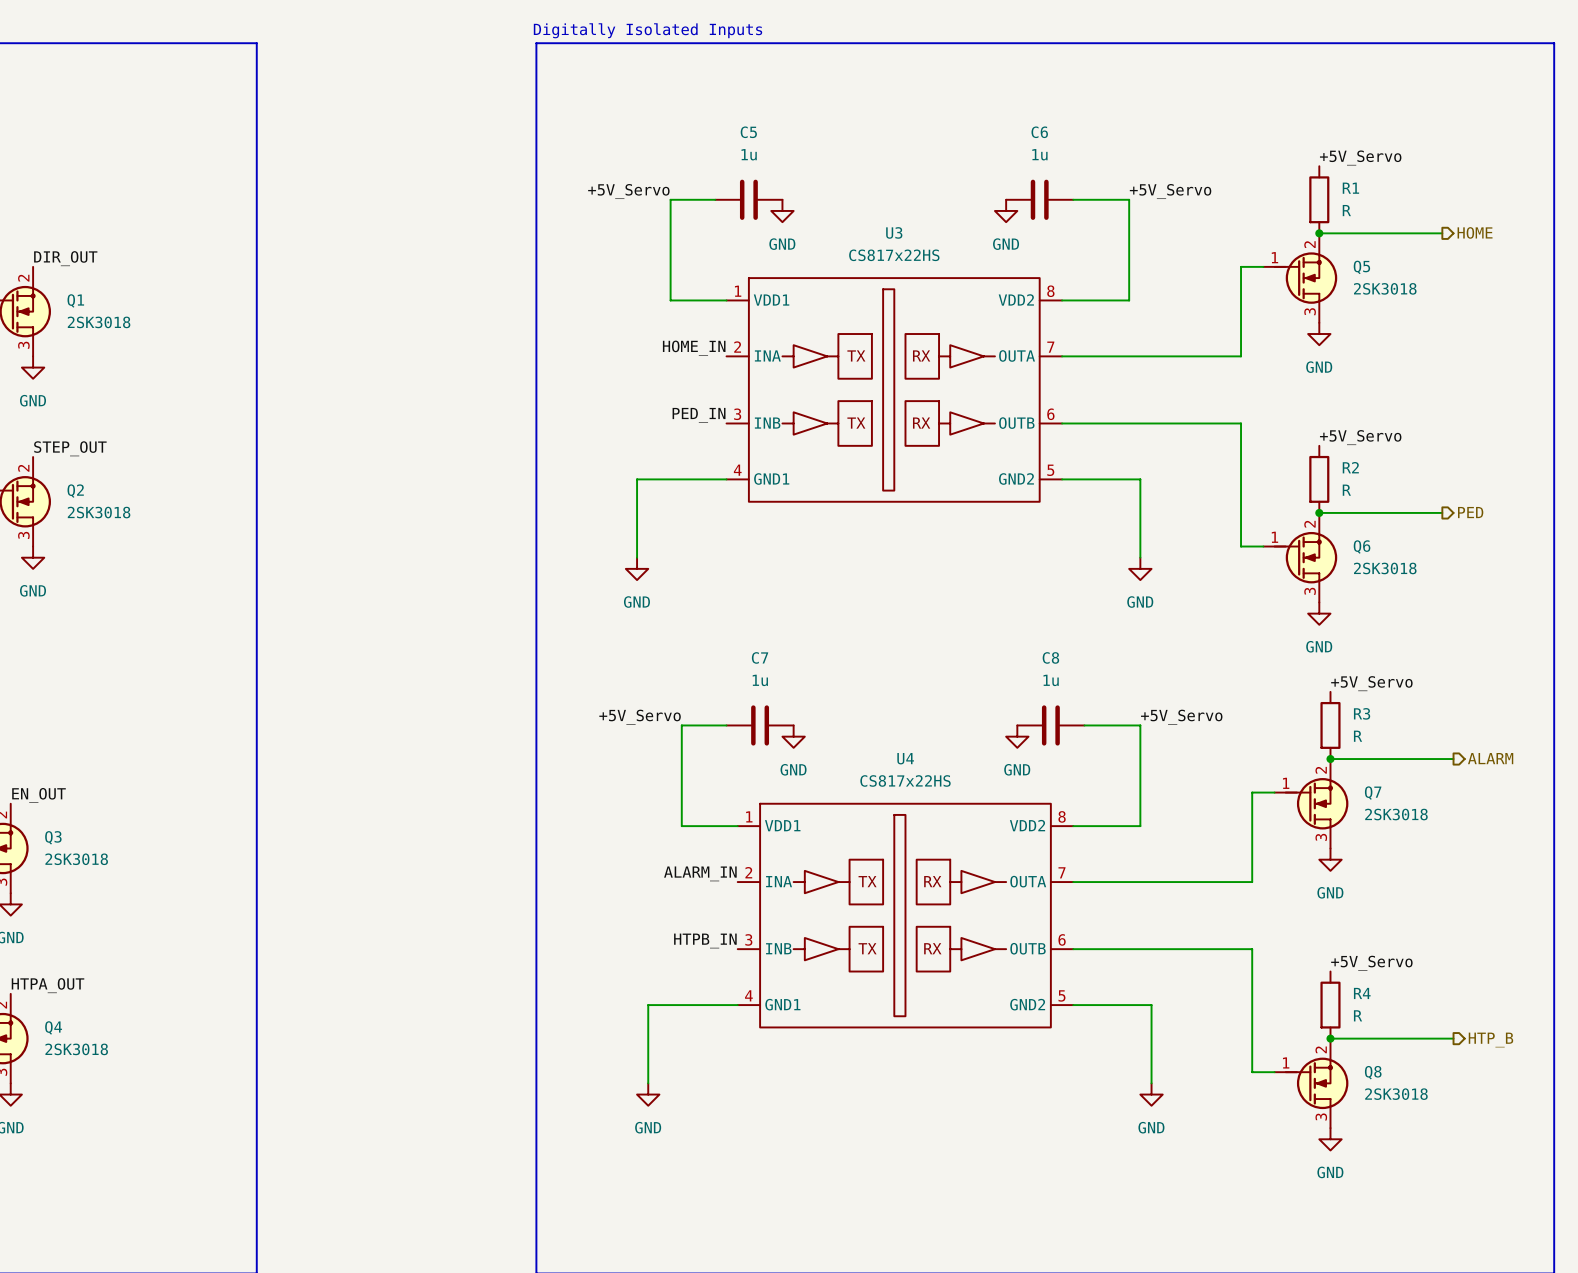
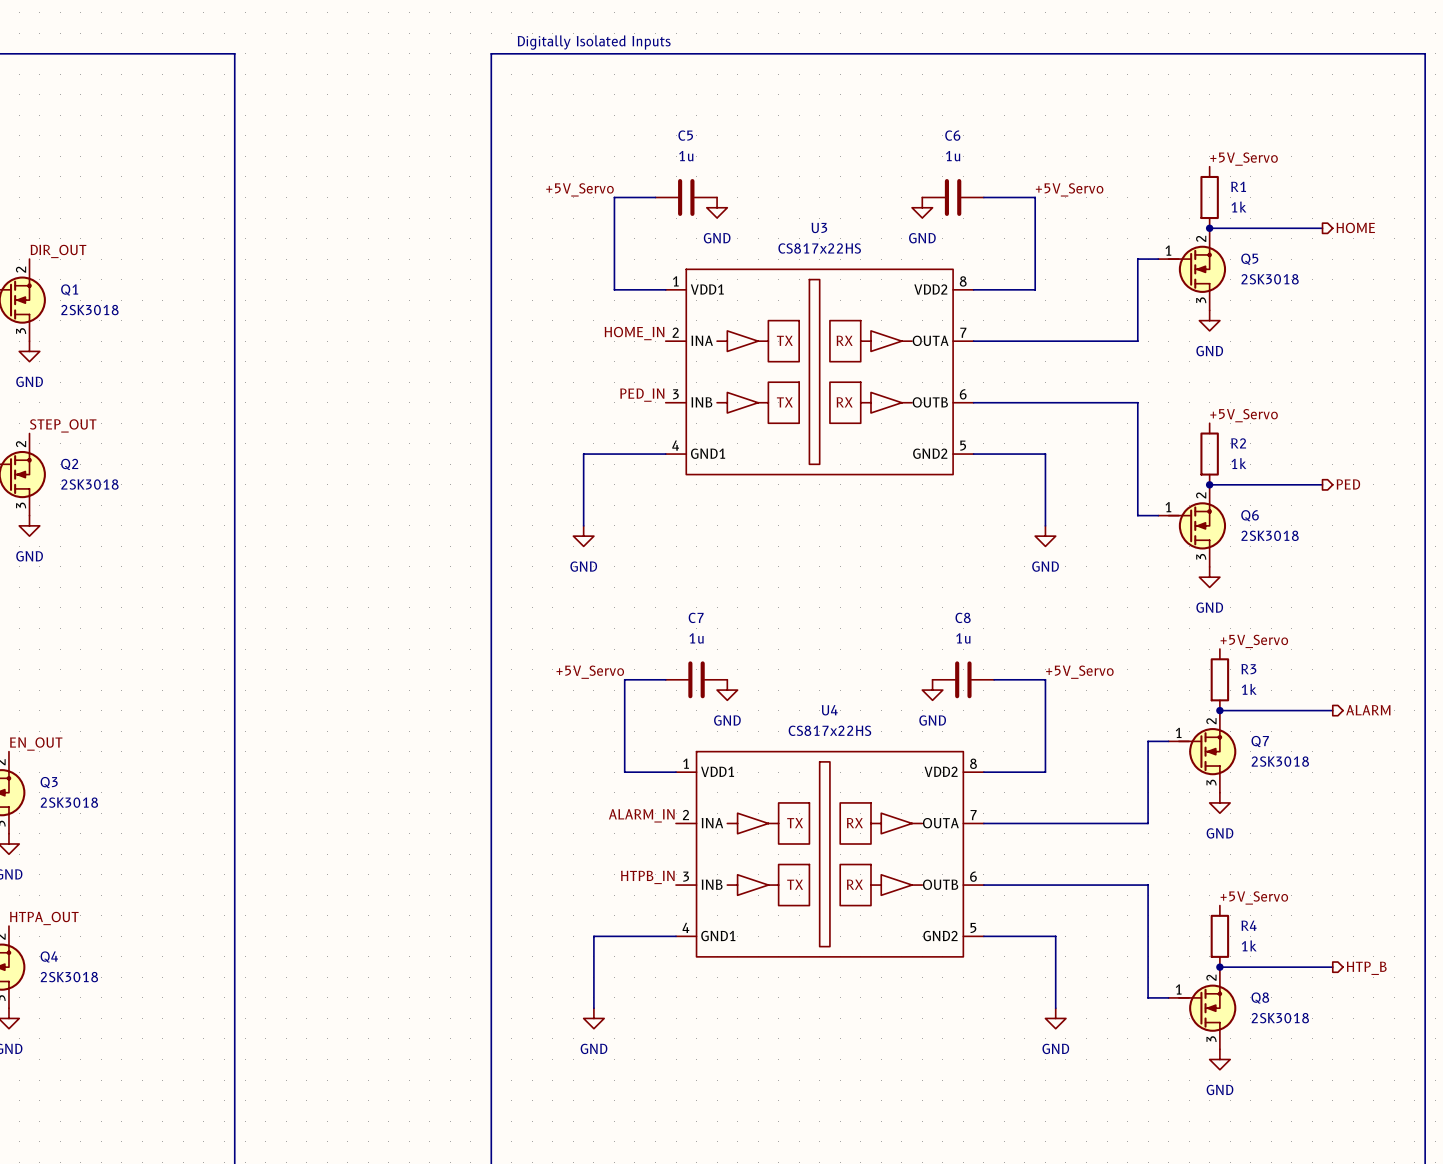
R1 value: R (1346, 210) -> 1k (1238, 207)
R2 value: R (1346, 490) -> 1k (1238, 463)
R3 value: R (1358, 736) -> 1k (1249, 689)
R4 value: R (1358, 1015) -> 1k (1249, 945)

